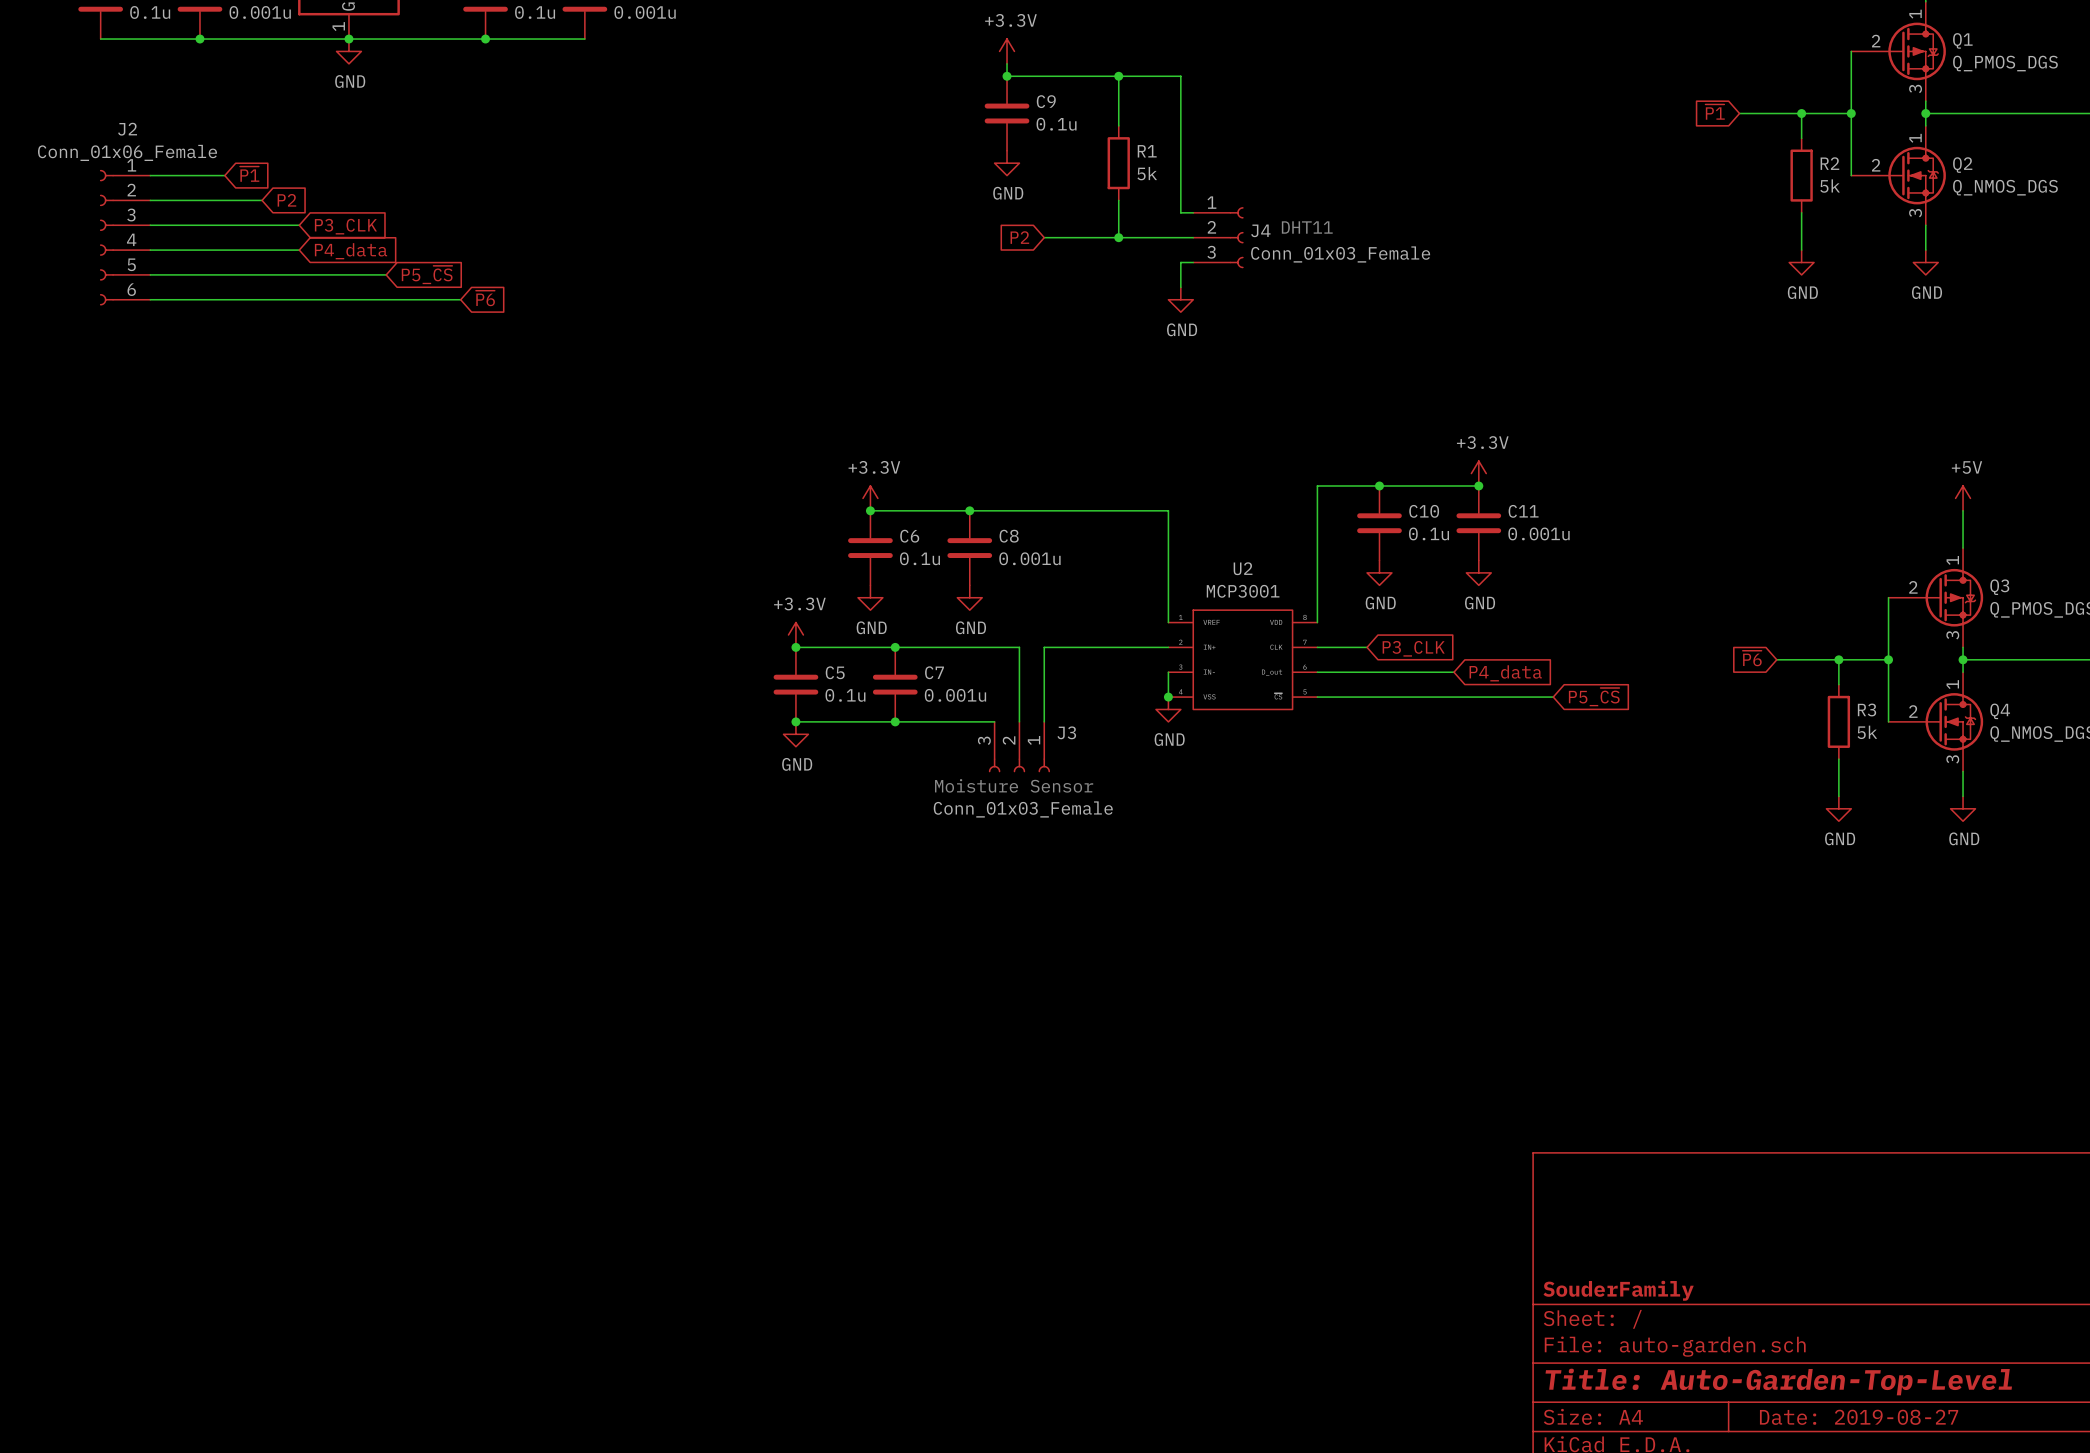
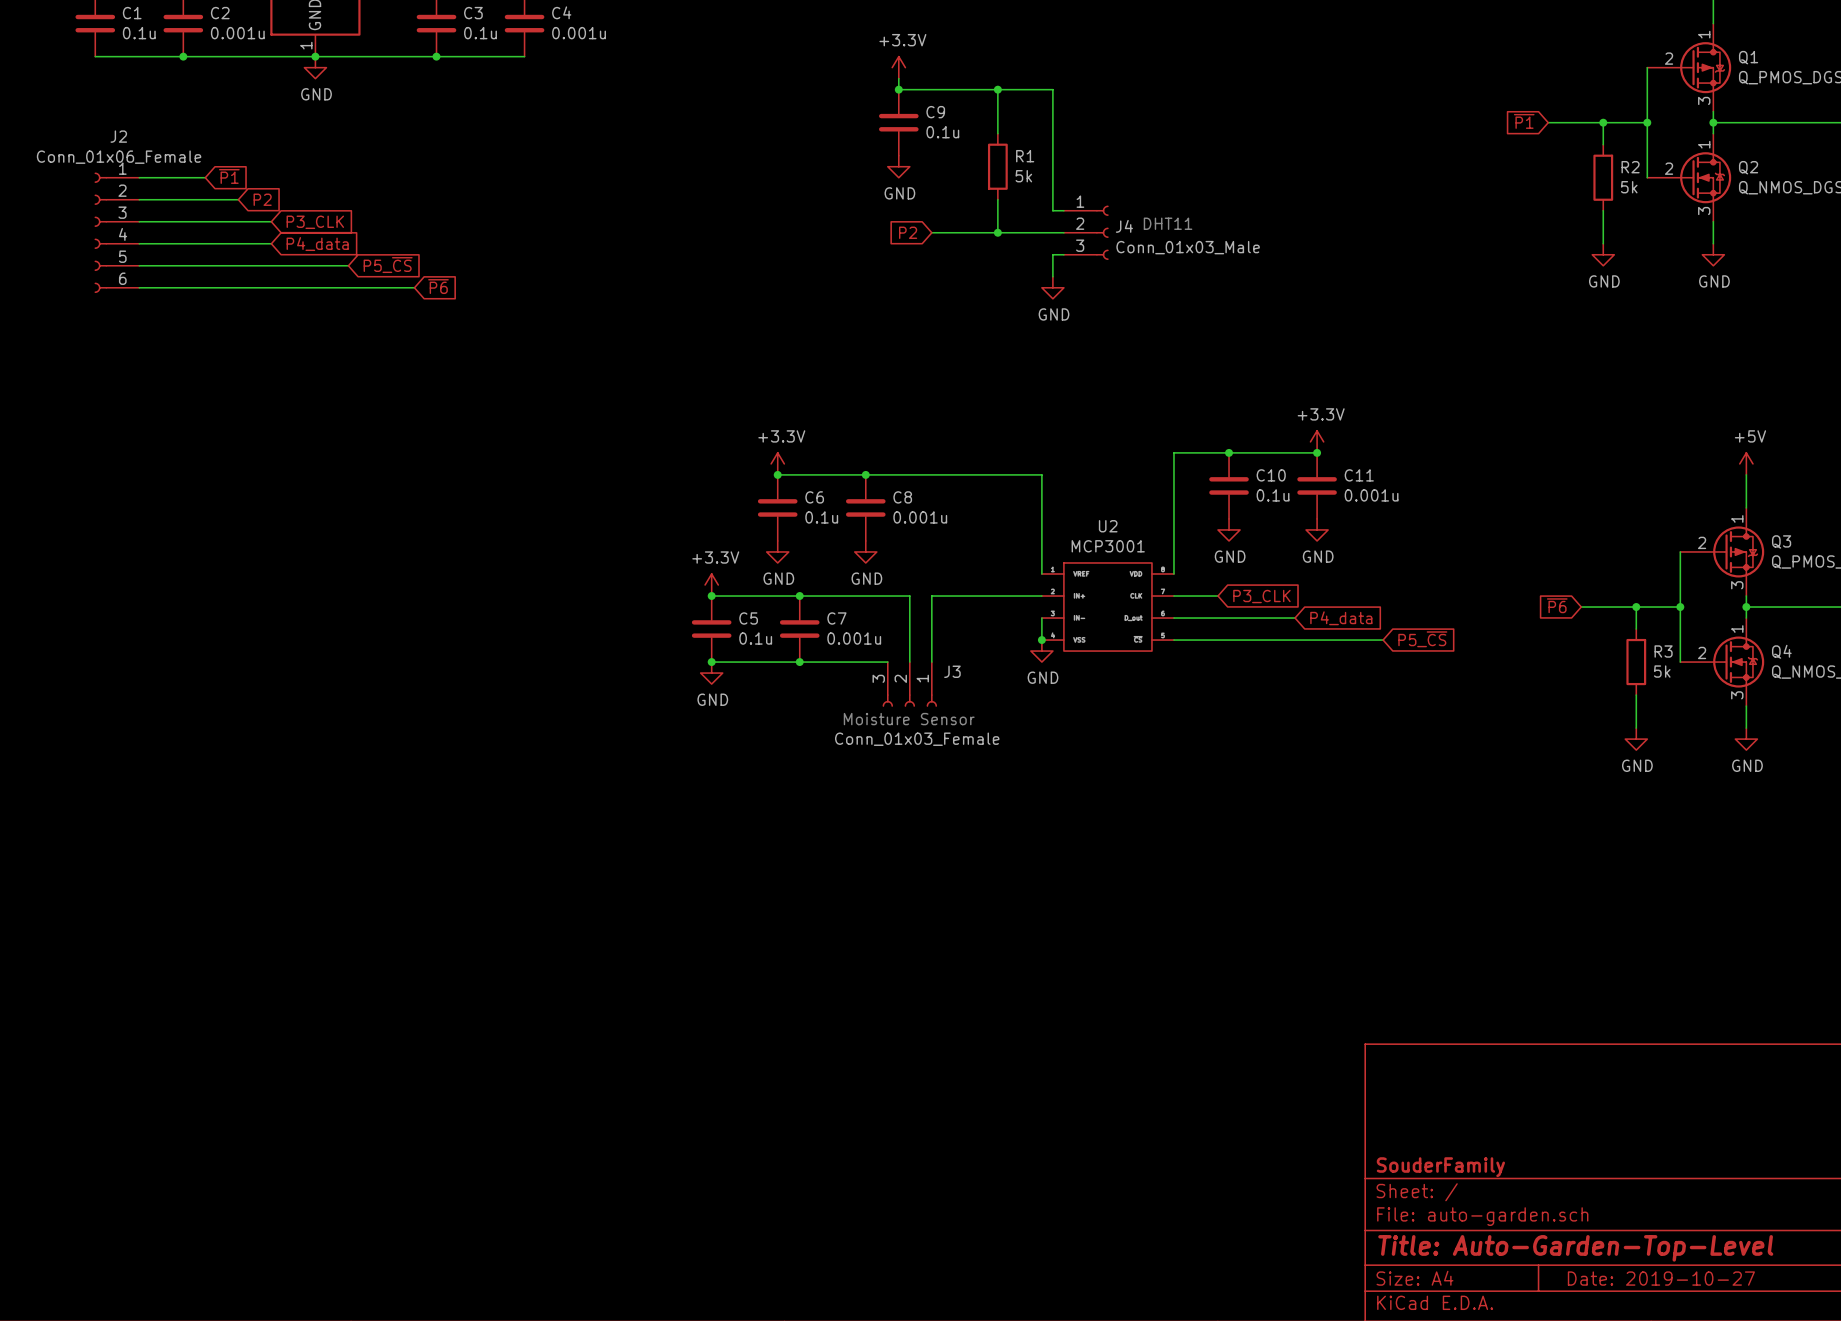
J4 value: Conn_01x03_Female (1340, 254) -> Conn_01x03_Male (1188, 247)
title block: Date: 2019-08-27 (1859, 1417) -> Date: 2019-10-27 (1661, 1278)

